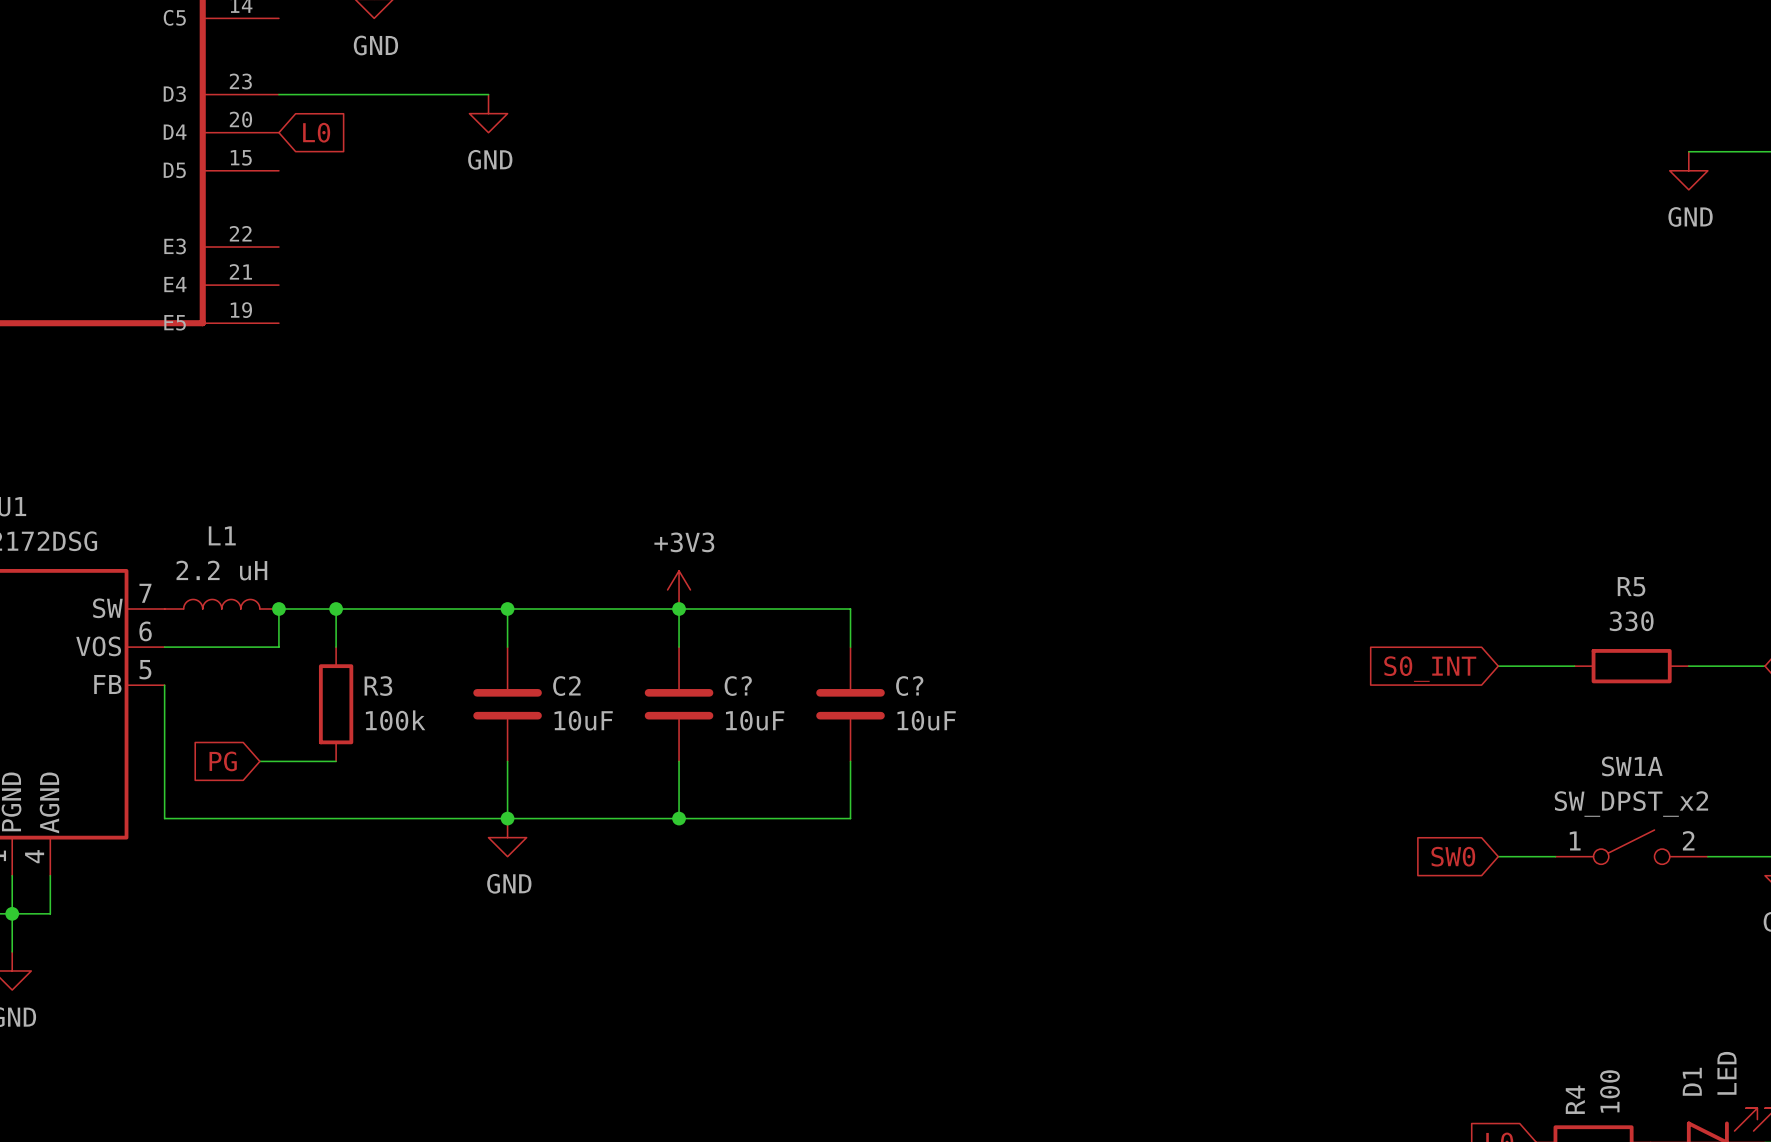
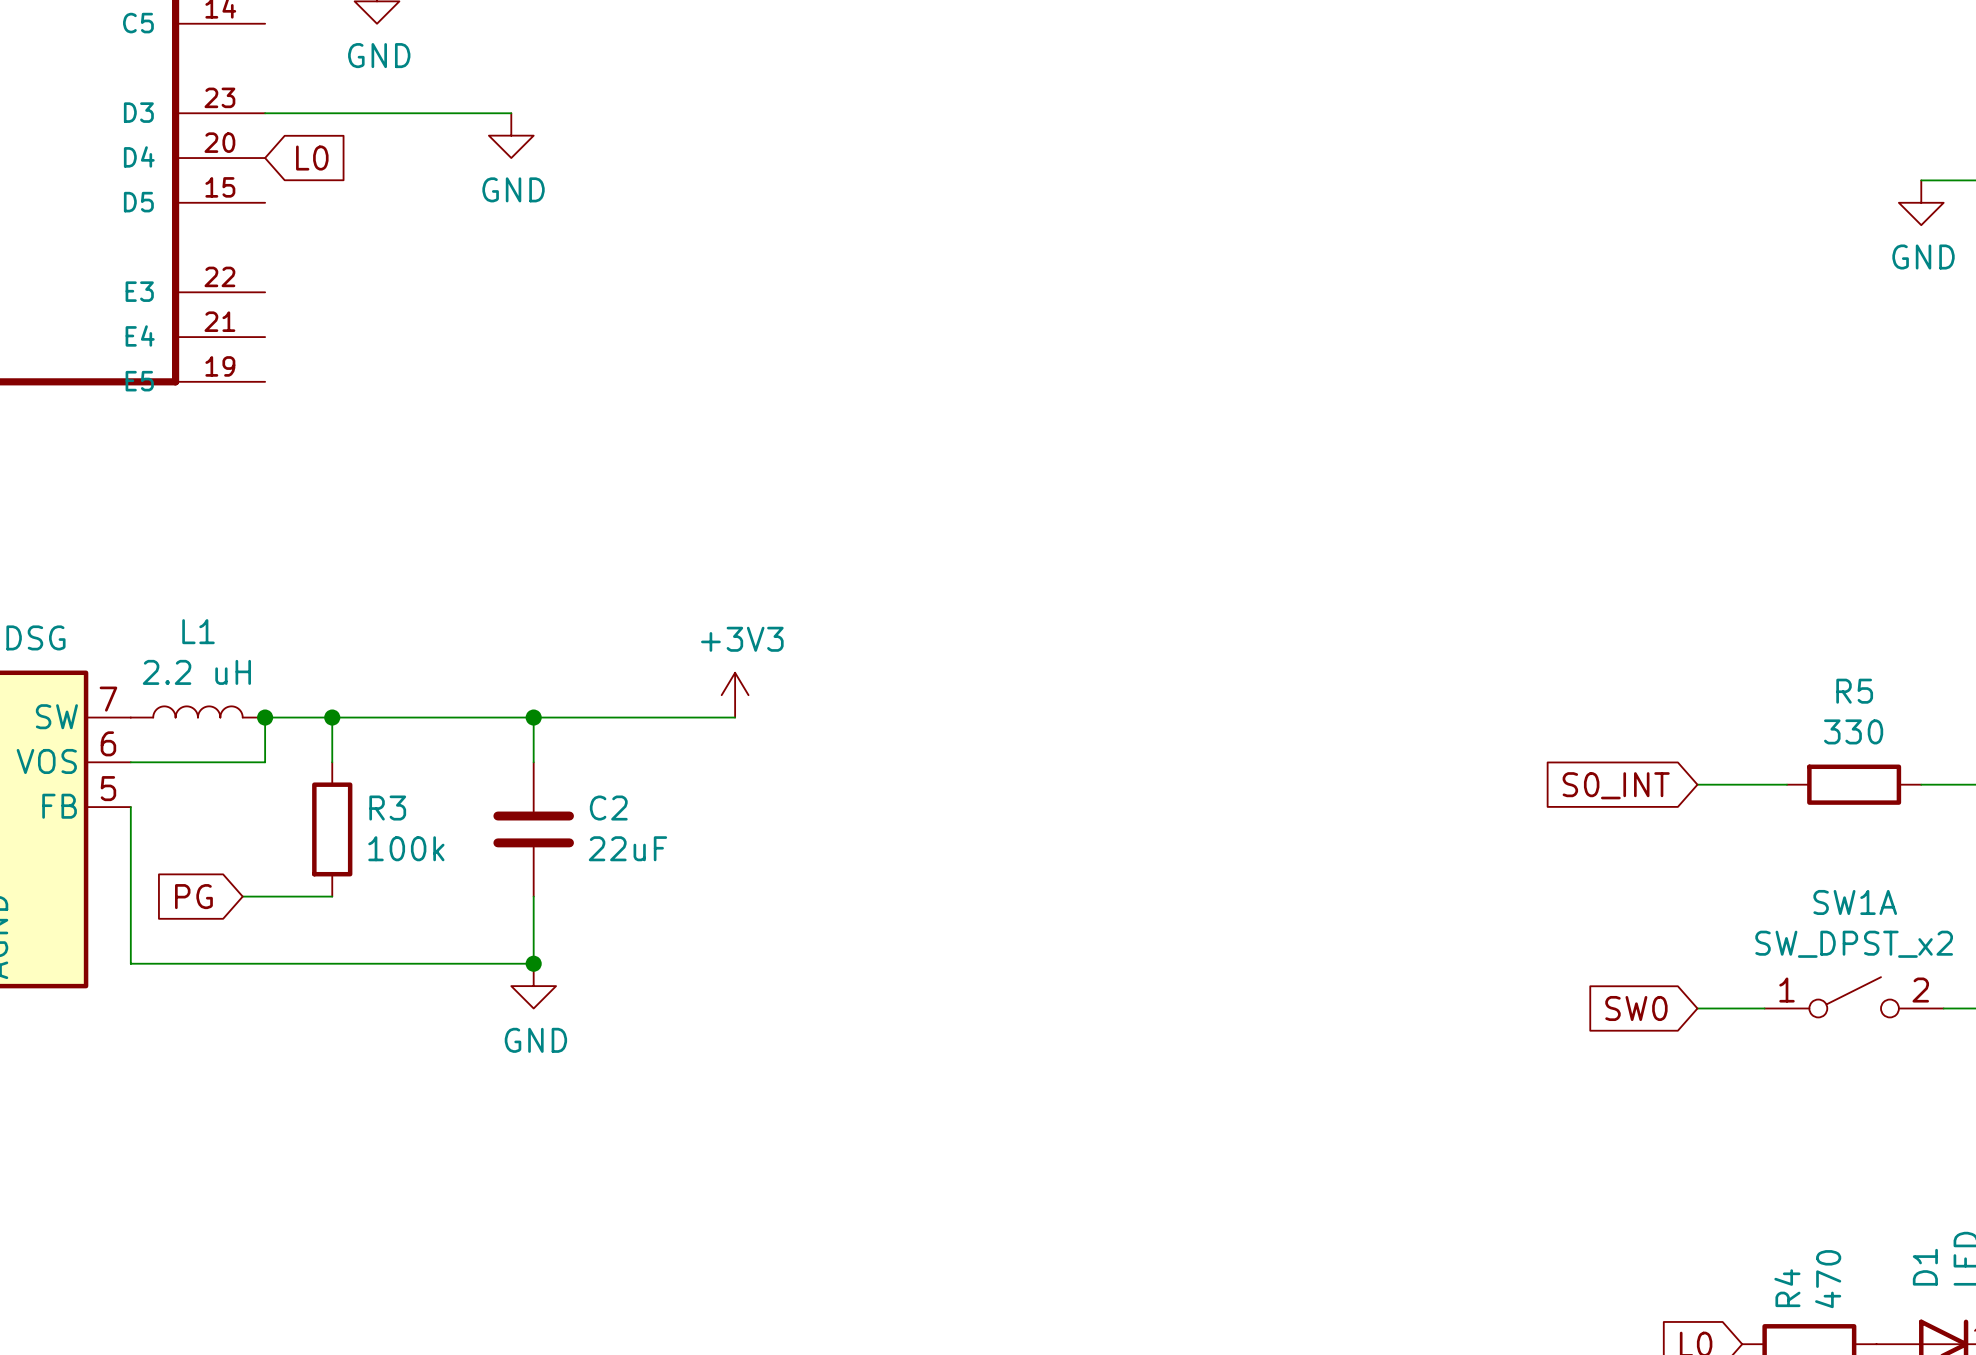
junction: (679, 609) -> none
wire: (679, 647) (679, 609) (850, 609) (850, 647) -> none
C?: 10uF (679, 704) -> none
C?: 10uF (850, 704) -> none
C2 value: 10uF (583, 720) -> 22uF (627, 848)
wire: (679, 761) (679, 818) -> none
wire: (850, 761) (850, 818) (507, 818) -> none
junction: (679, 818) -> none
R4 value: 100 (1610, 1091) -> 470 (1828, 1279)

